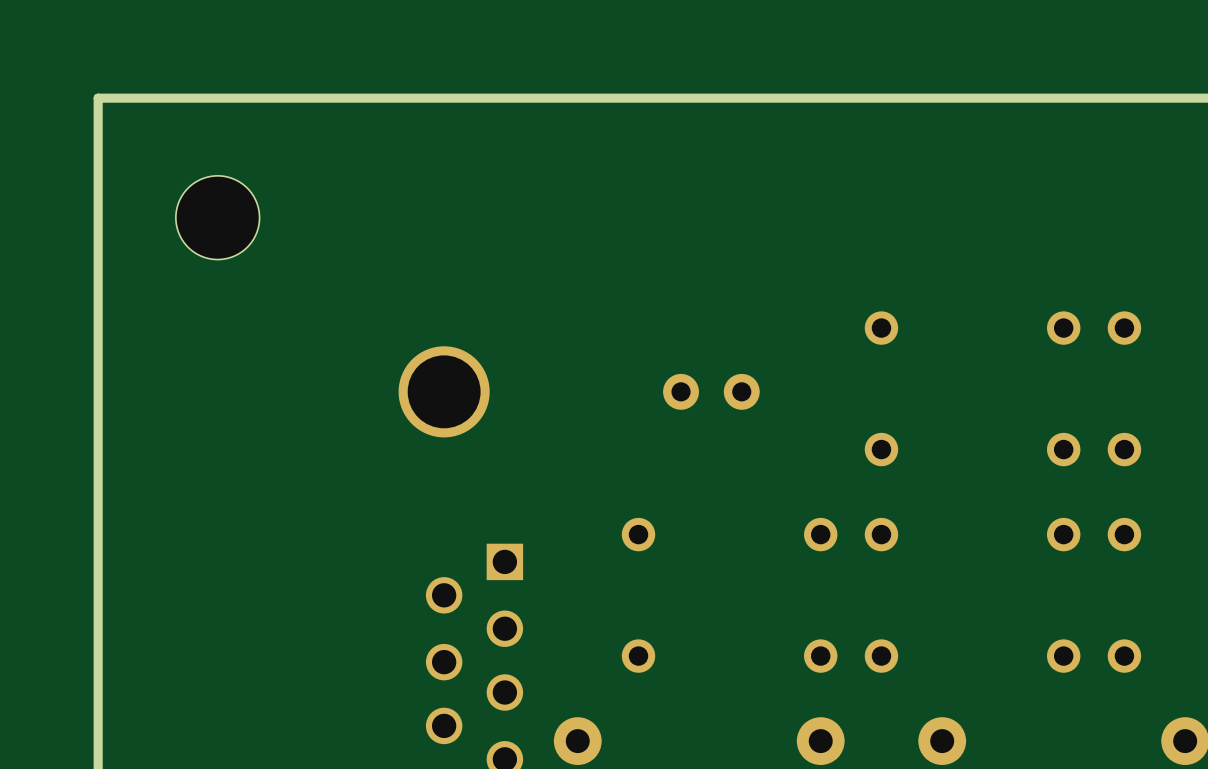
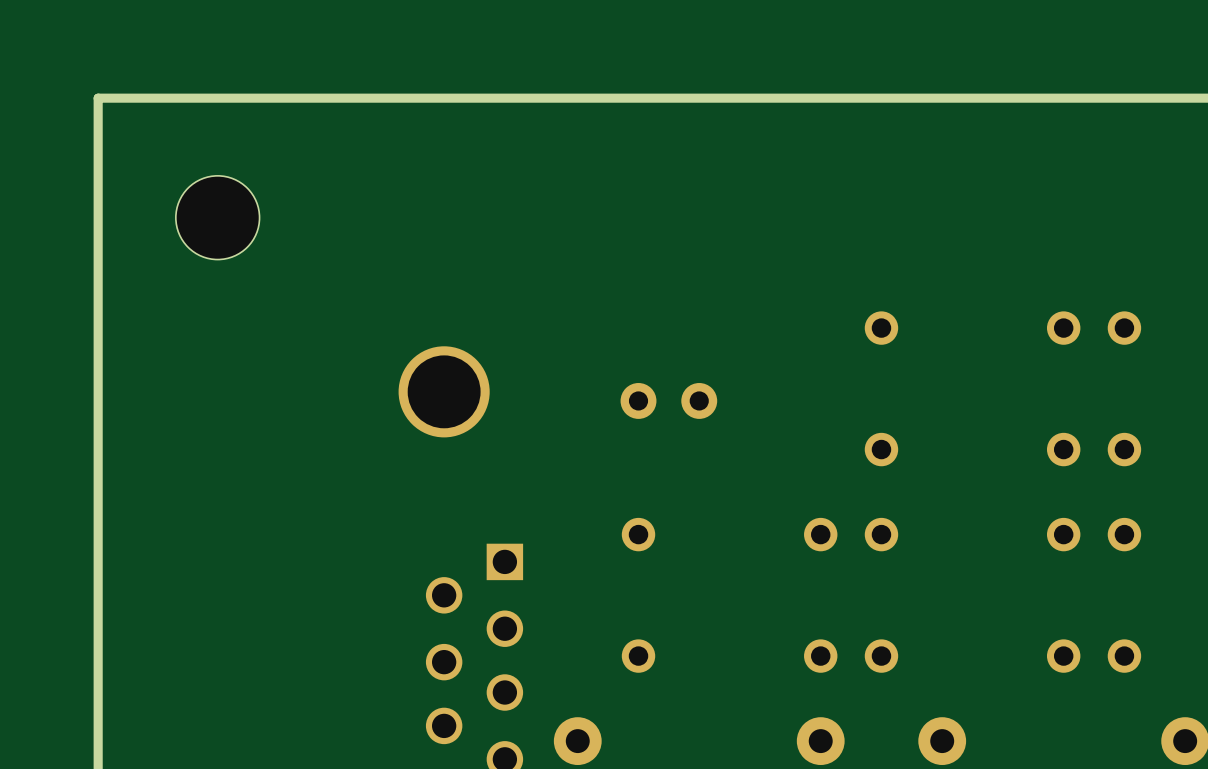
part position: (711, 391) -> (668, 400)

